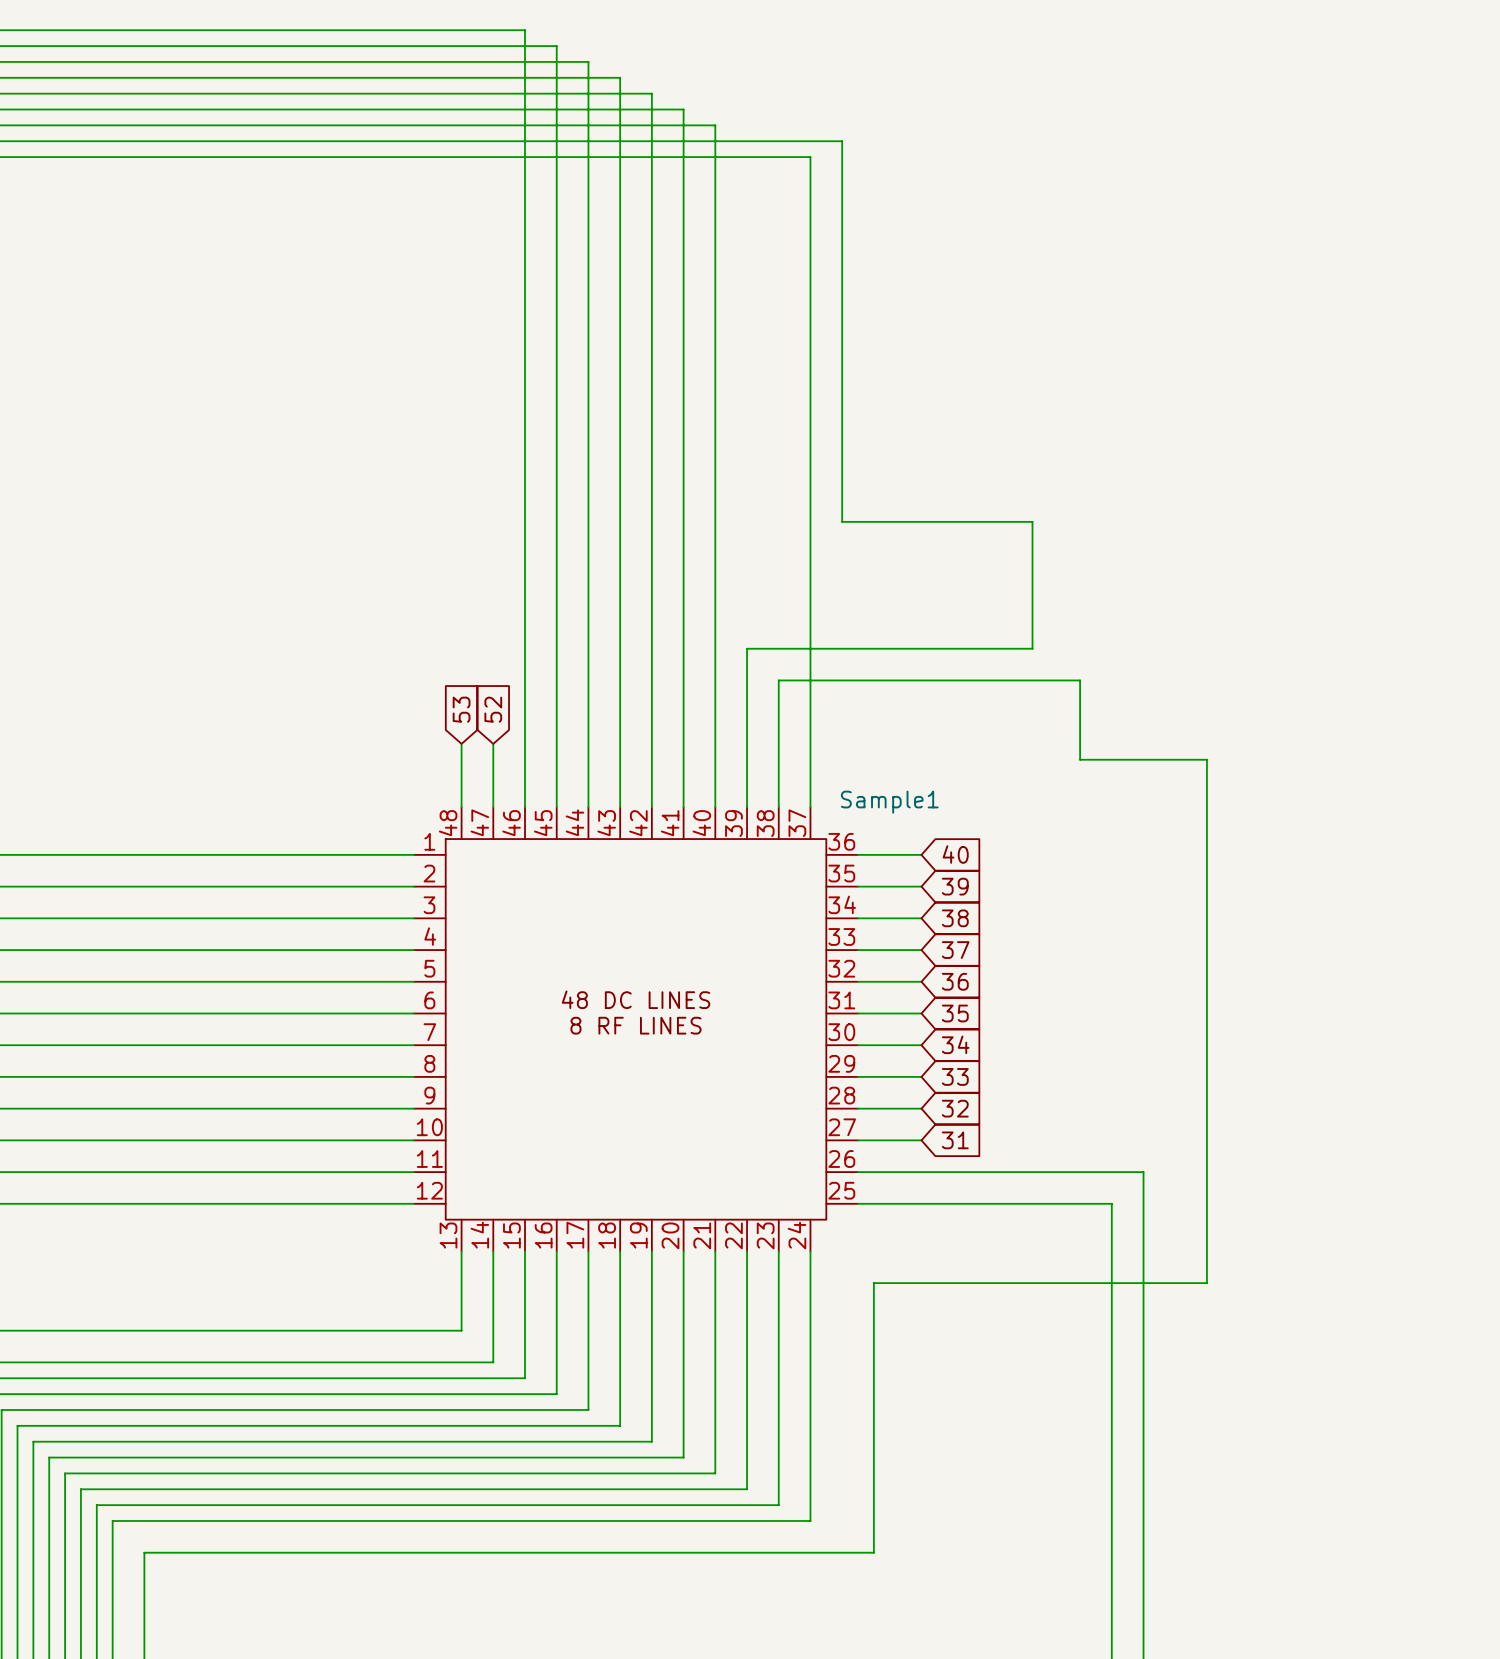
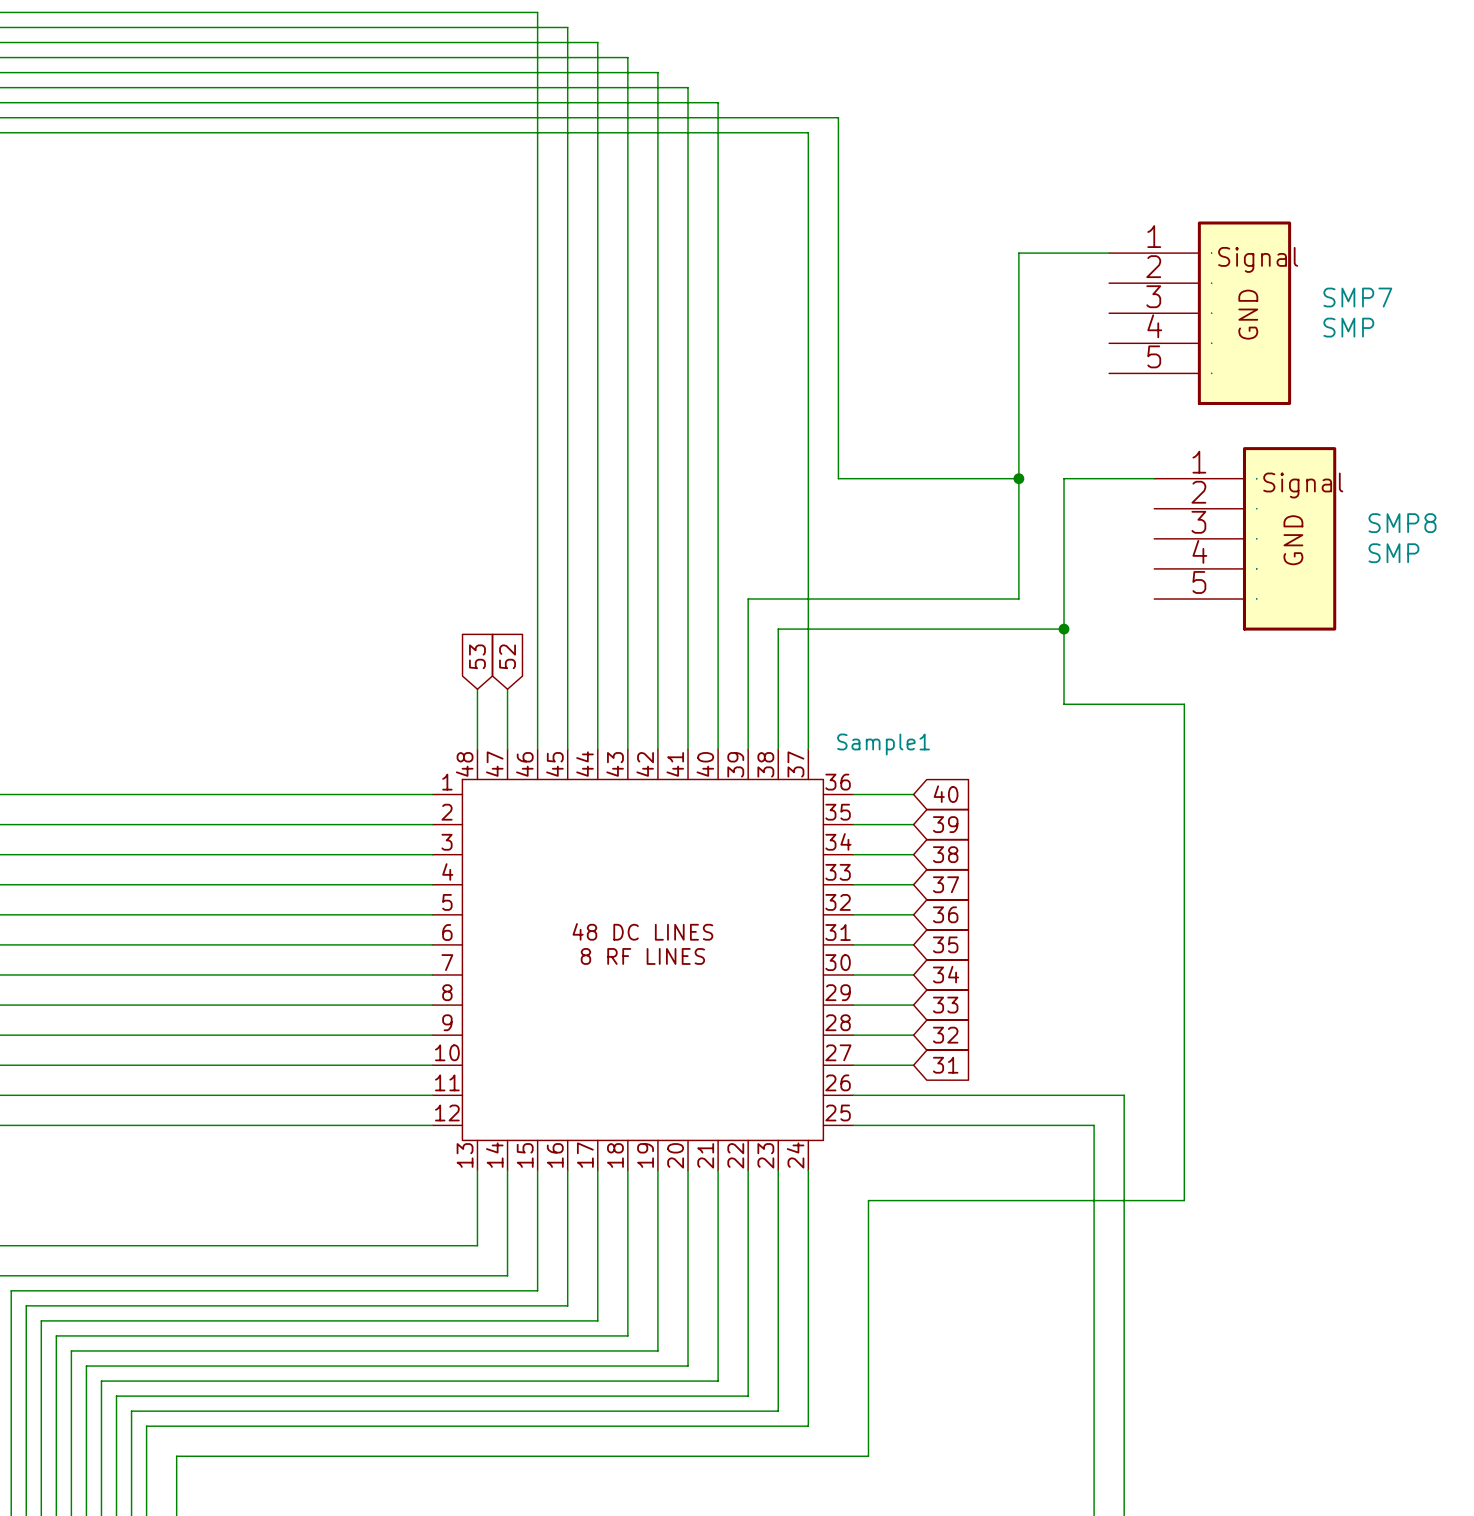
wire: none -> (1109, 253) (1018, 253) (1018, 478)
SMP7: none -> SMP (1200, 313)
junction: none -> (1018, 478)
wire: none -> (1154, 478) (1064, 478) (1064, 629)
SMP8: none -> SMP (1245, 538)
junction: none -> (1064, 629)

